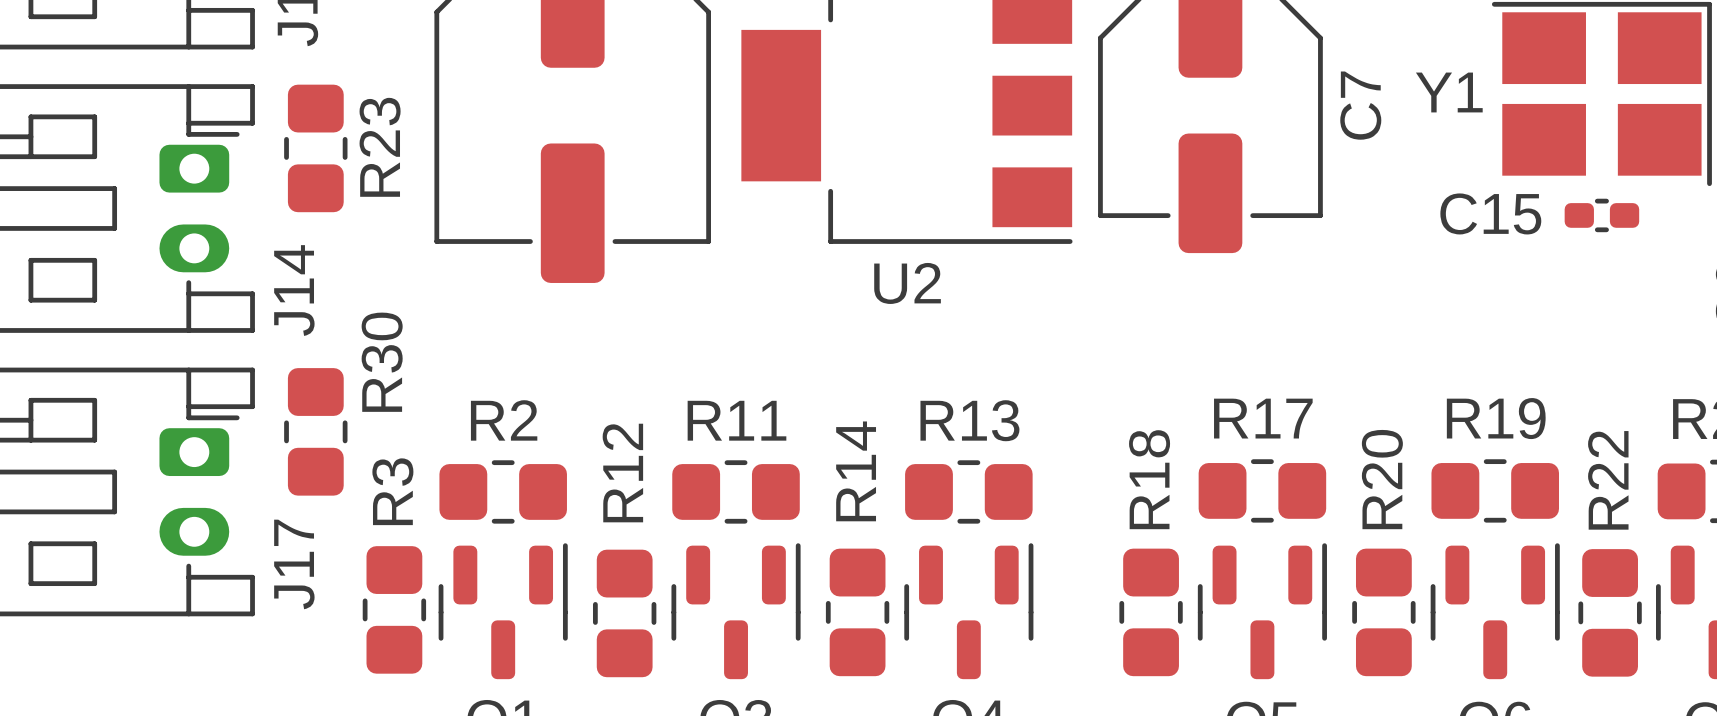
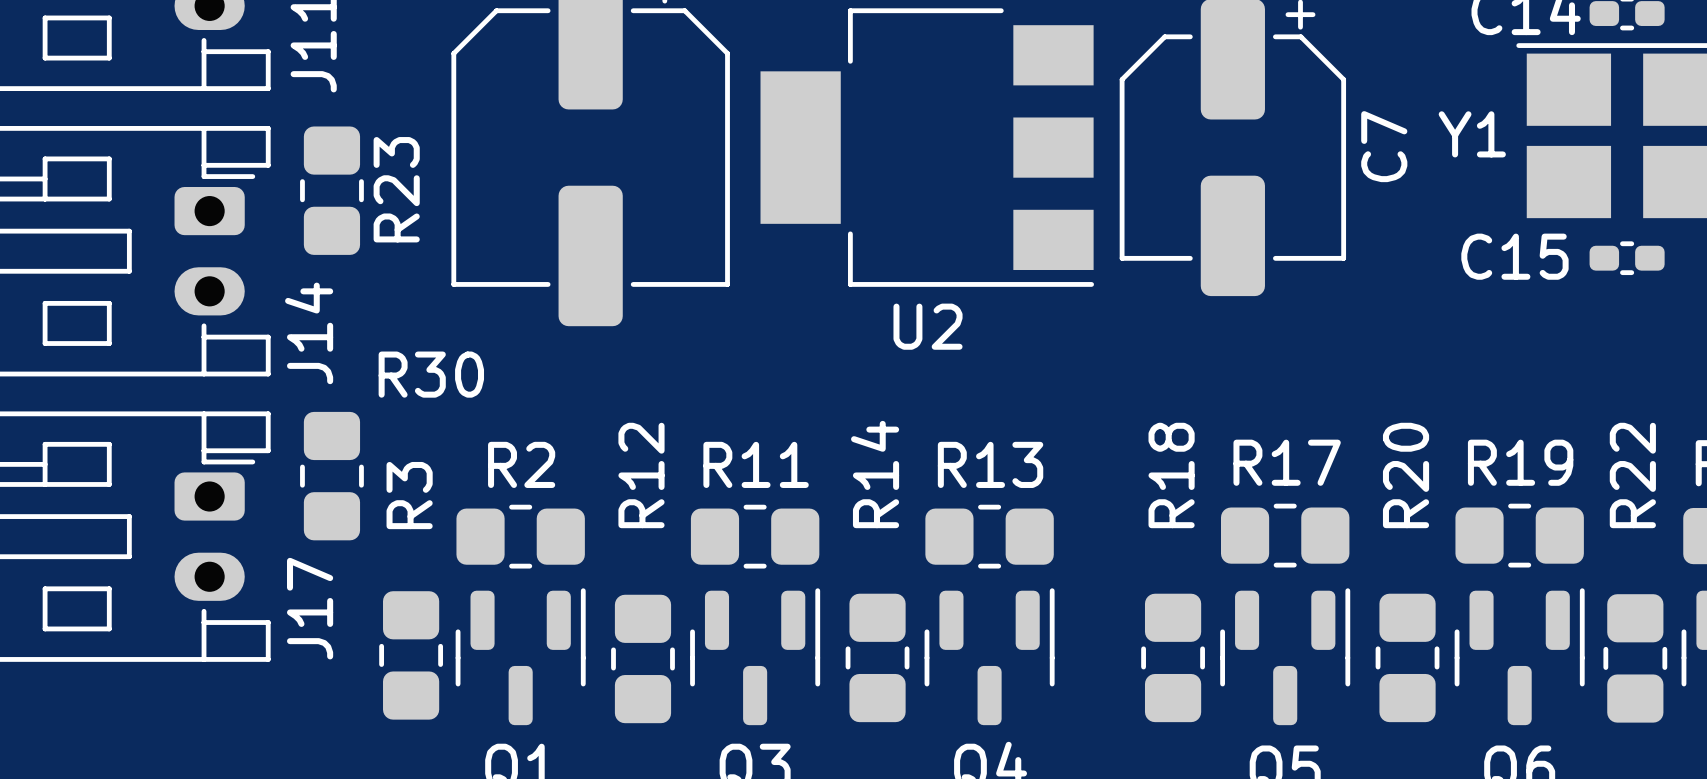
R30 name rotation: 0° (382, 362) -> 90° clockwise (431, 374)
R14 name position: R14 (856, 471) -> R14 (875, 474)
R12 name position: R12 (622, 473) -> R12 (641, 475)
R18 name position: R18 (1149, 479) -> R18 (1171, 475)
R20 name position: R20 (1382, 479) -> R20 (1406, 475)
R22 name position: R22 (1608, 480) -> R22 (1632, 475)
R3 name position: R3 (392, 491) -> R3 (409, 495)

